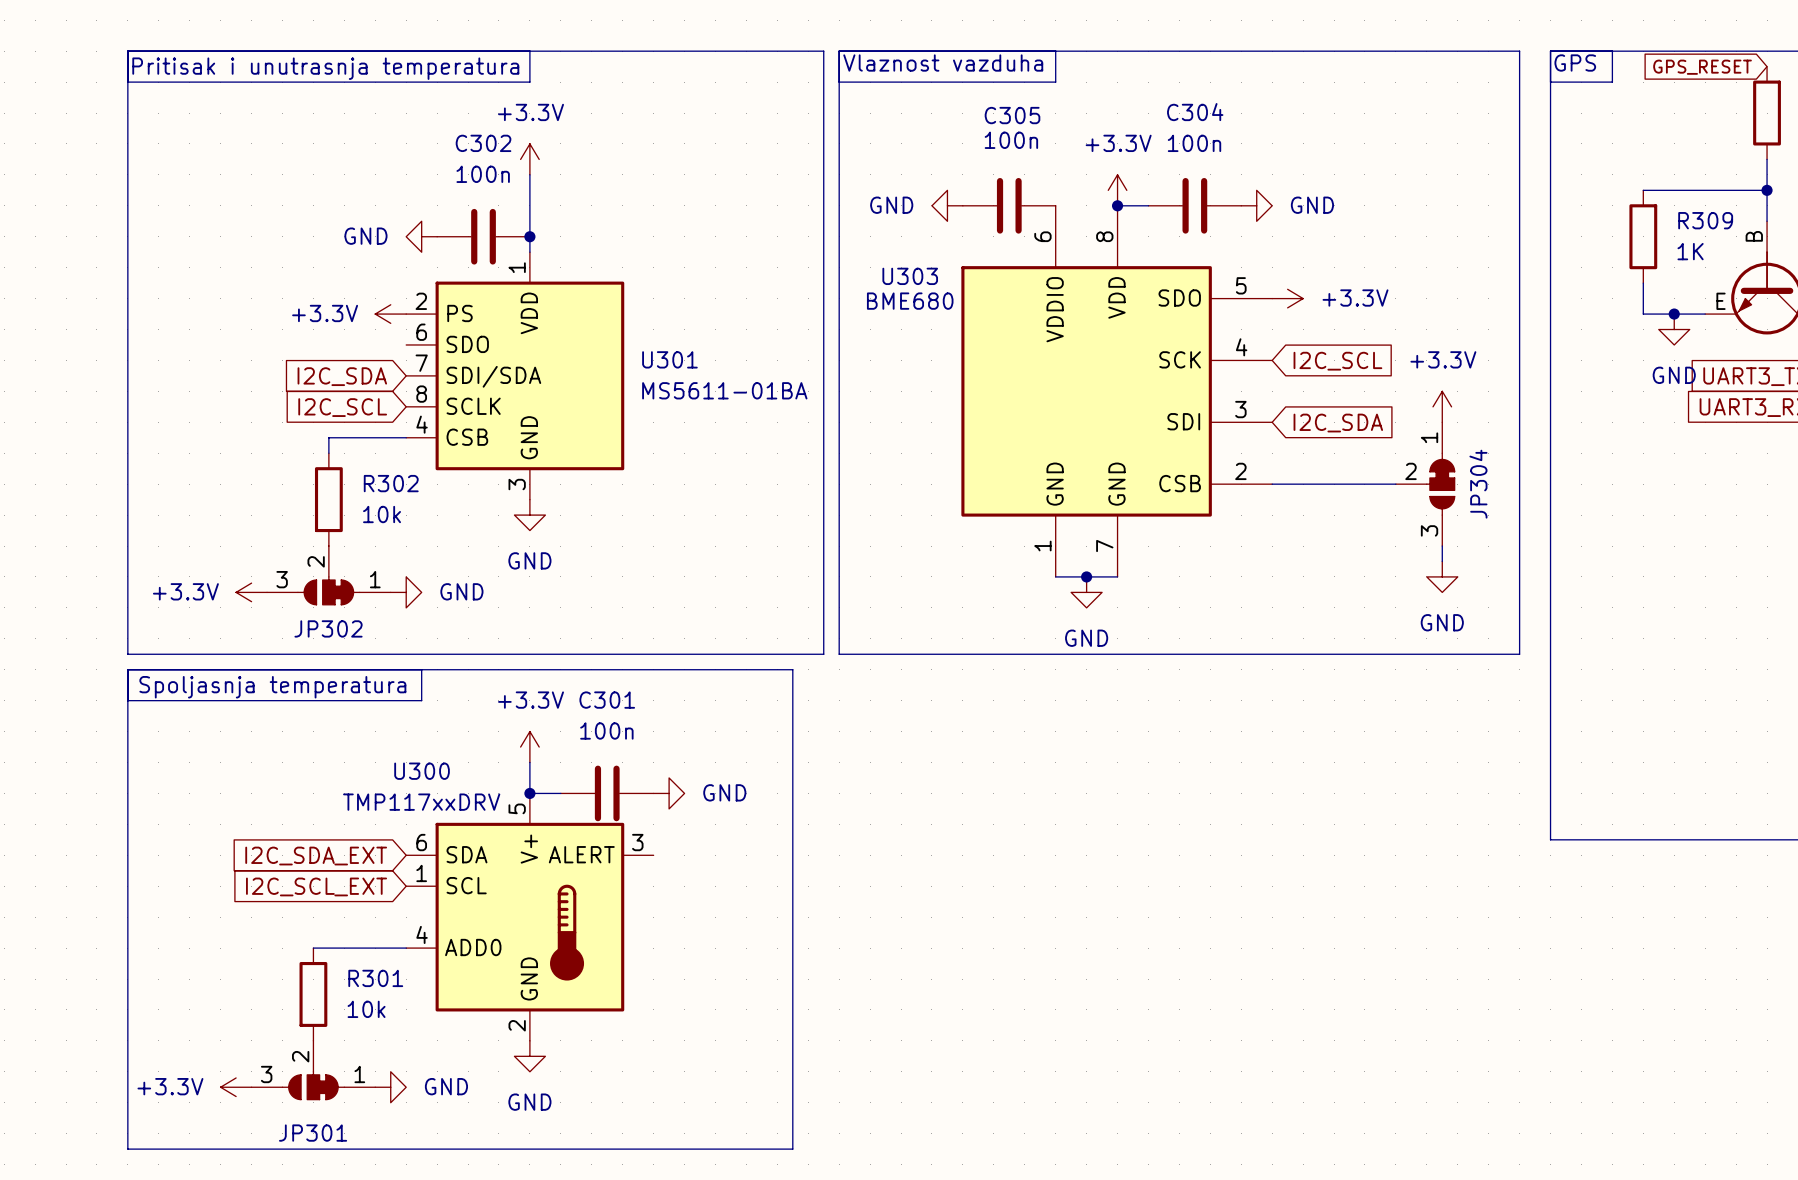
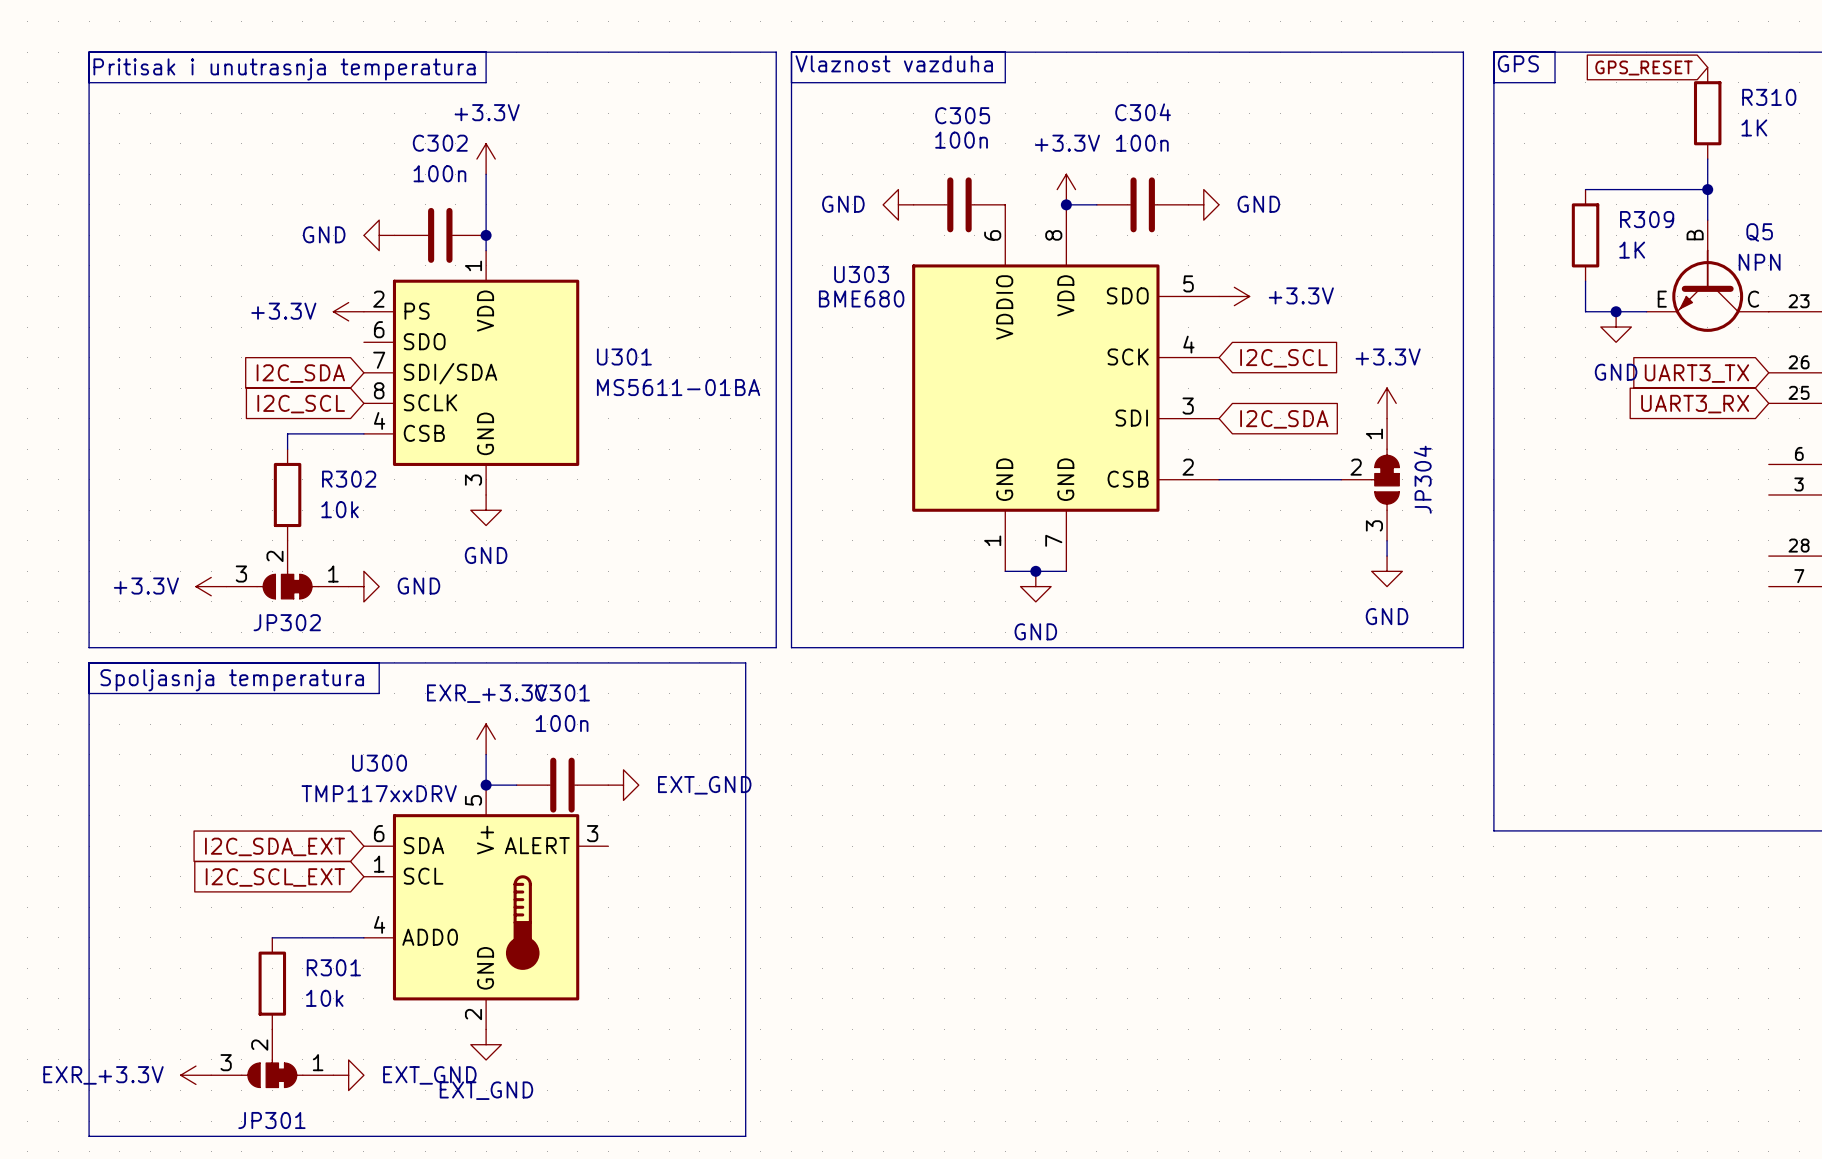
power symbol: +3.3V (529, 747) -> EXR_+3.3V (486, 739)
power symbol: GND (669, 793) -> EXT_GND (623, 785)
power symbol: GND (529, 1056) -> EXT_GND (486, 1044)
power symbol: +3.3V (236, 1087) -> EXR_+3.3V (195, 1075)
power symbol: GND (390, 1087) -> EXT_GND (348, 1075)

